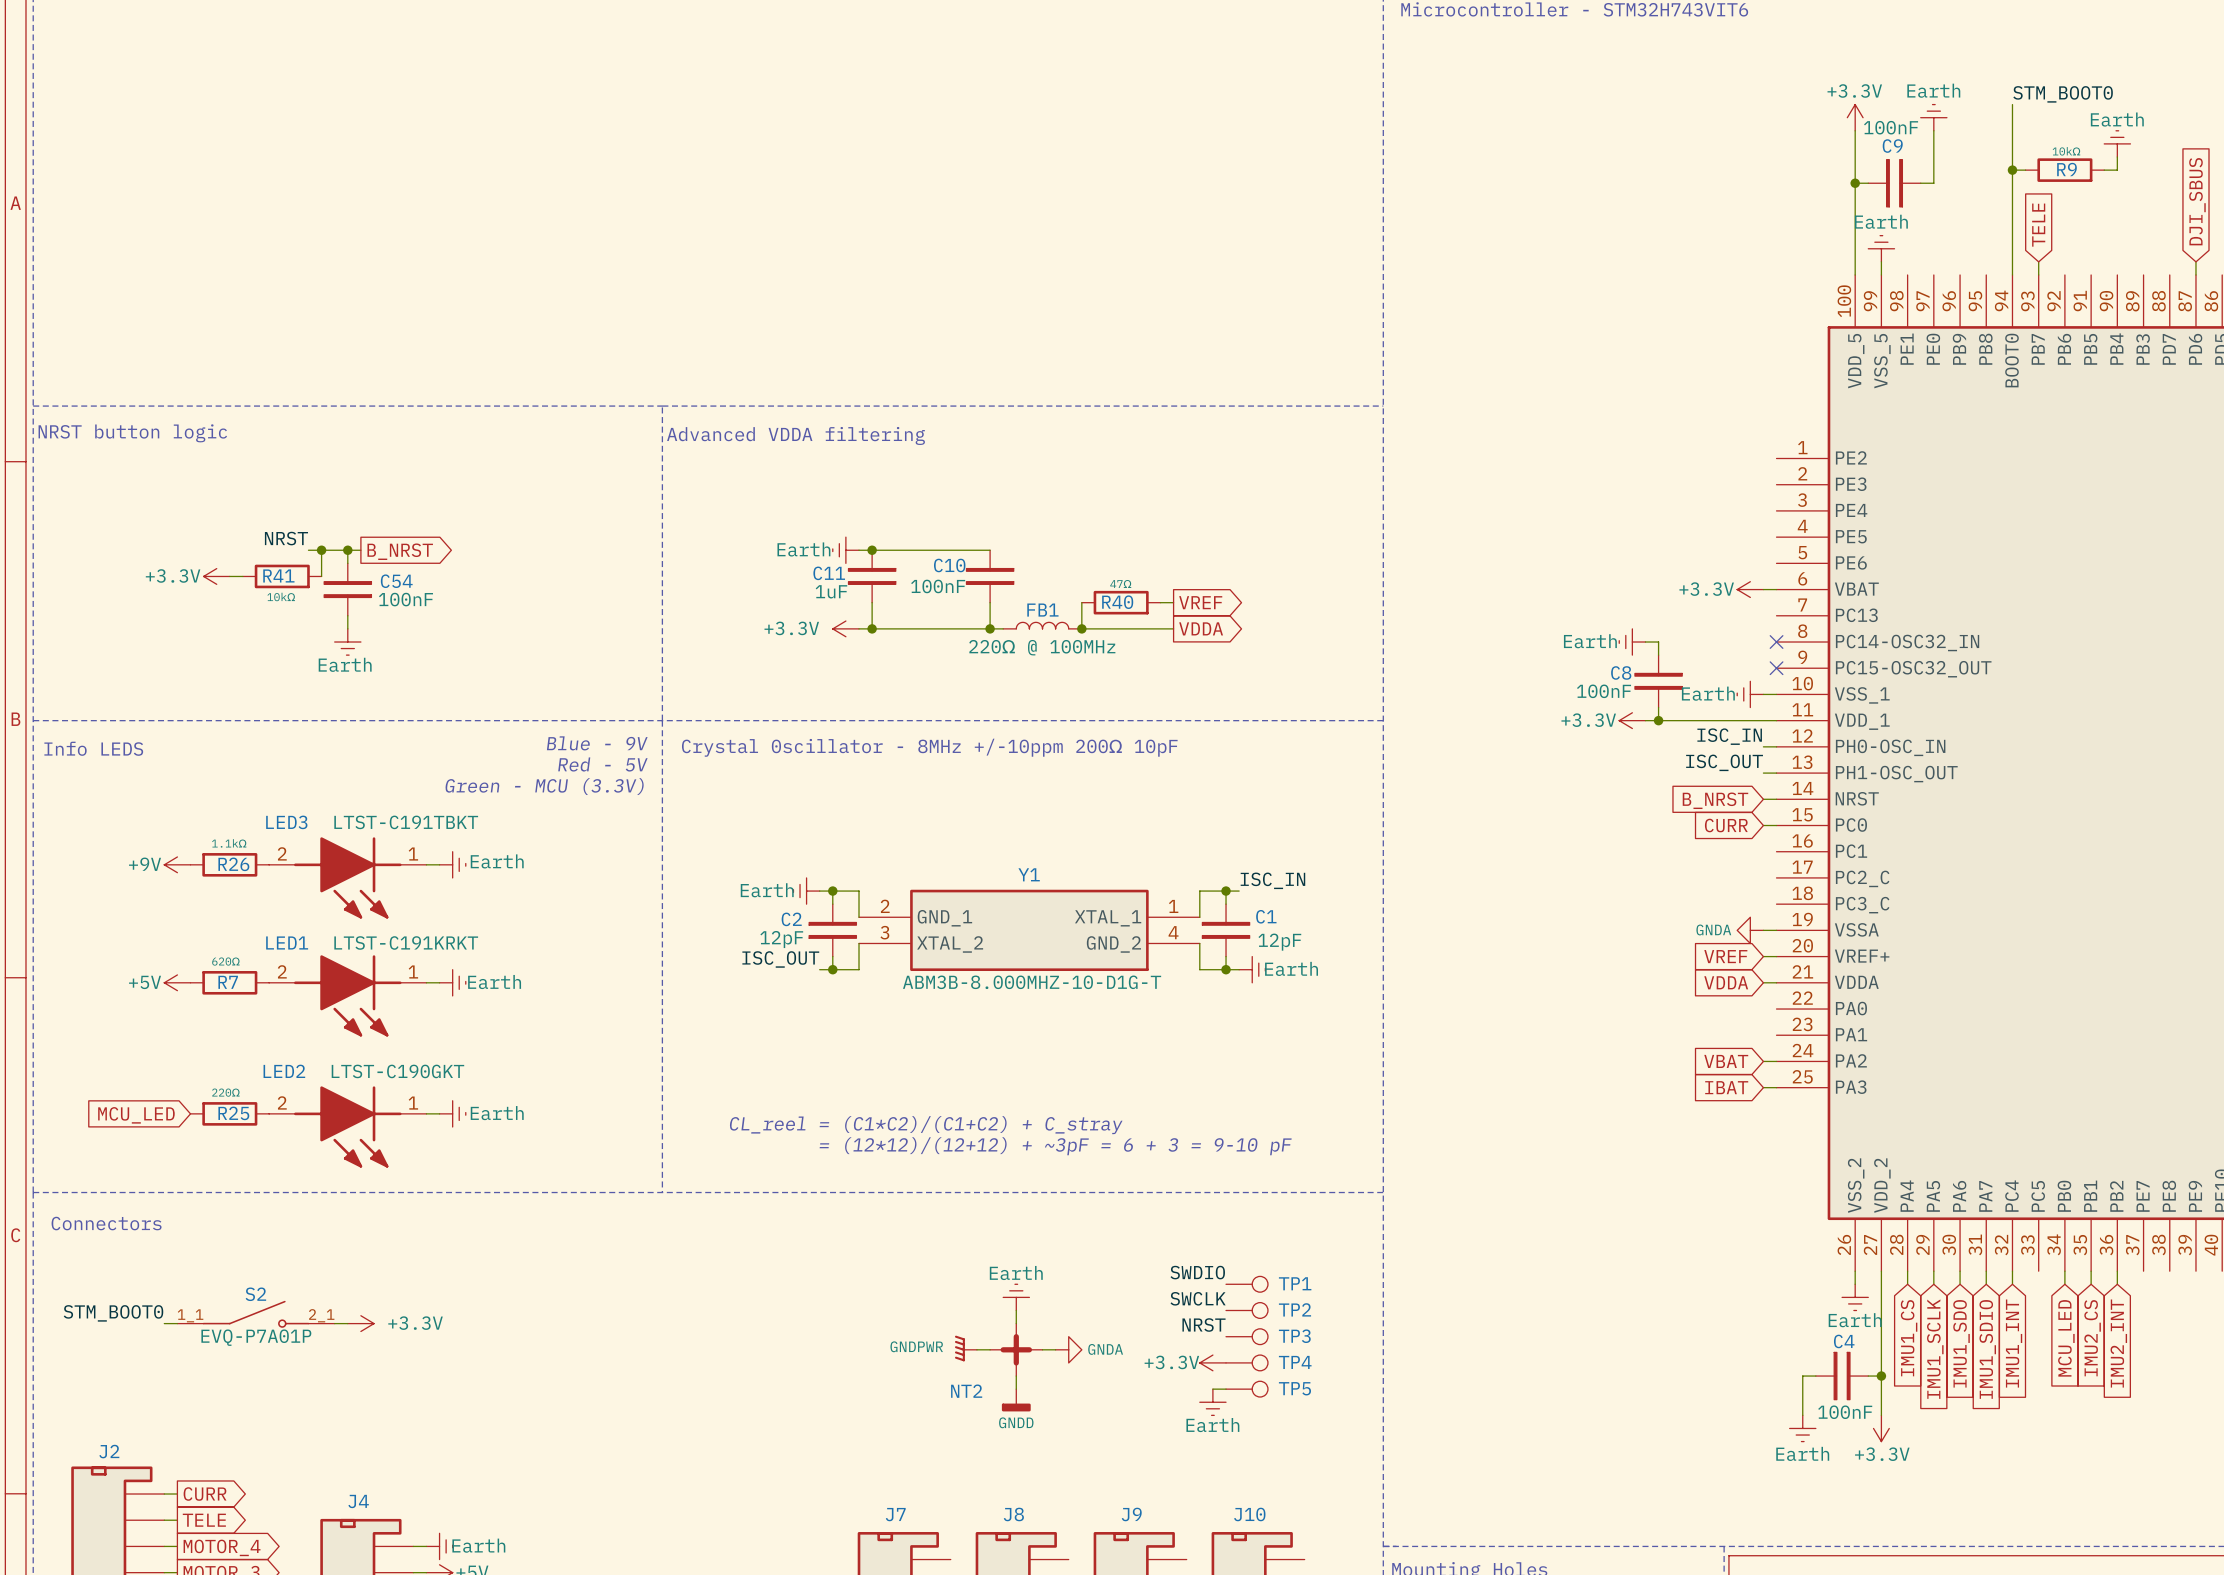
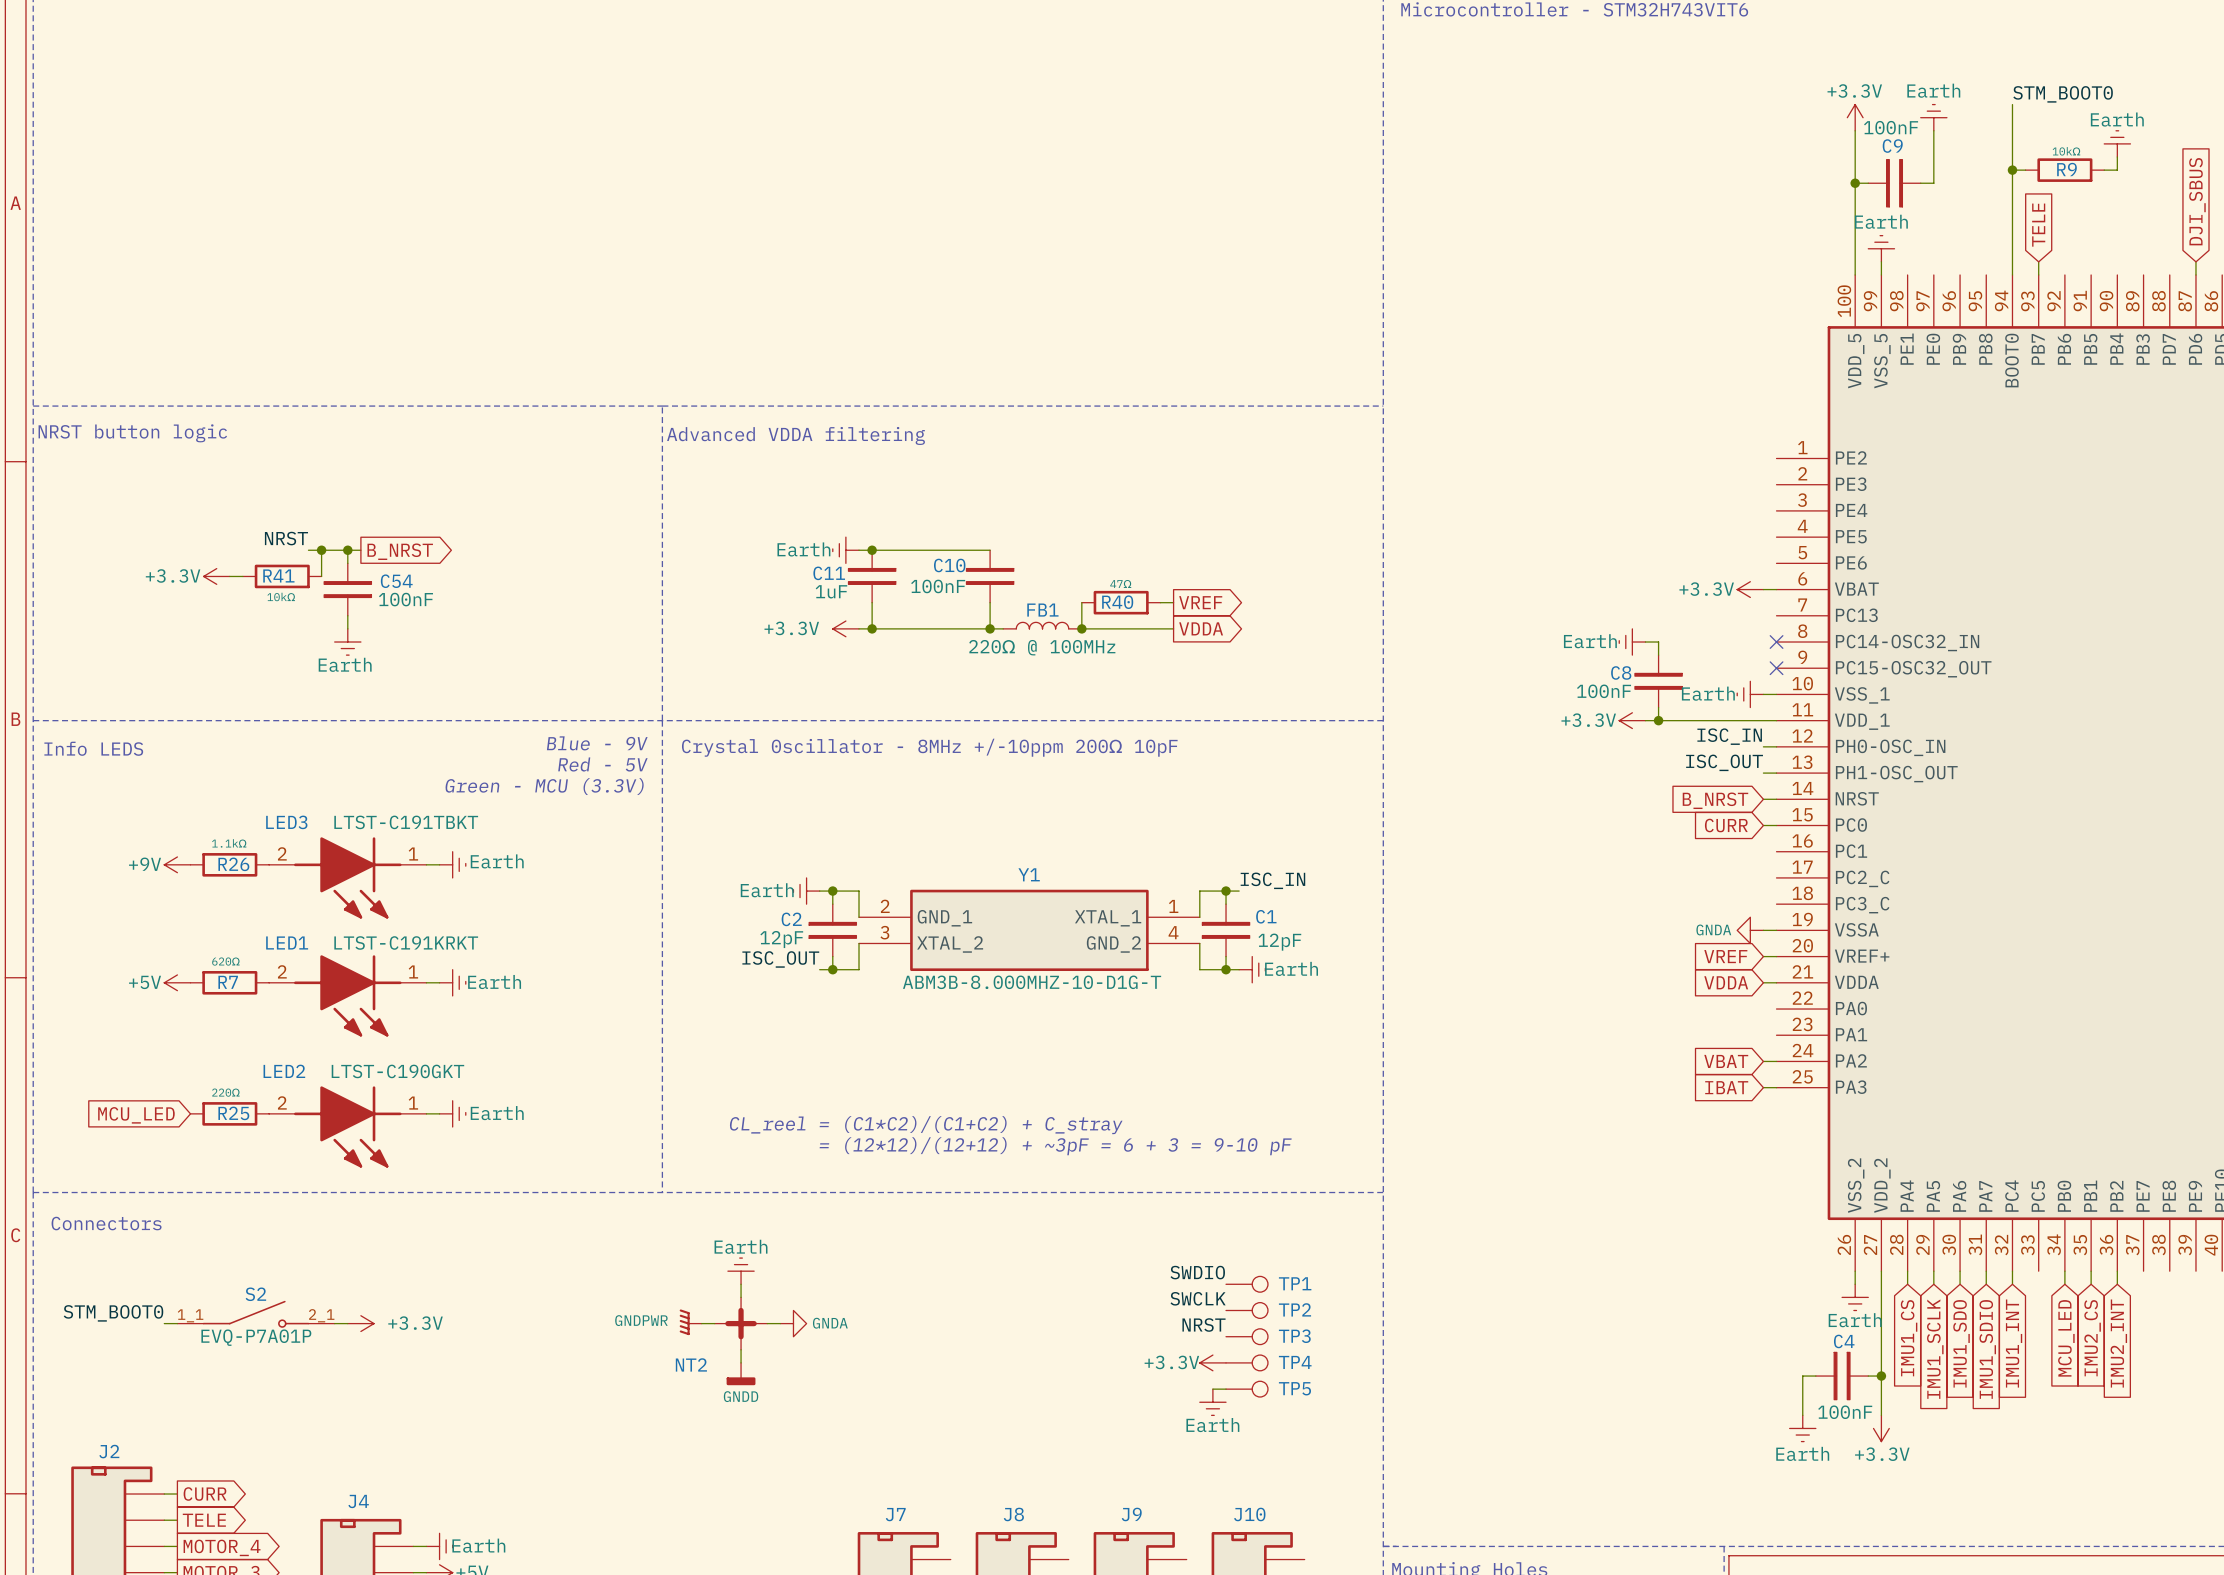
power symbol: none -> Earth (741, 1271)
wire: none -> (741, 1284) (741, 1297)
power symbol: Earth (1016, 1297) -> none
wire: (1016, 1310) (1016, 1323) -> none
power symbol: none -> GNDPWR (690, 1322)
wire: none -> (701, 1323) (714, 1323)
power symbol: none -> GNDA (793, 1323)
power symbol: GNDPWR (965, 1348) -> none
wire: none -> (741, 1349) (741, 1362)
wire: (976, 1349) (990, 1349) -> (767, 1323) (780, 1323)
NT2 position: (1016, 1349) -> (741, 1323)
wire: (1042, 1349) (1055, 1349) -> none
power symbol: GNDA (1068, 1349) -> none
power symbol: none -> GNDD (741, 1374)
wire: (1016, 1376) (1016, 1389) -> none
power symbol: GNDD (1016, 1400) -> none

